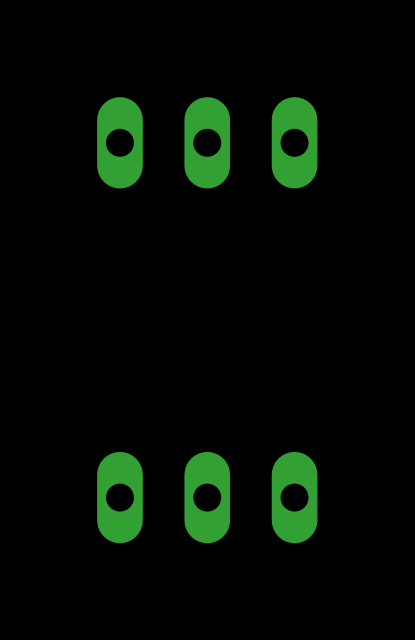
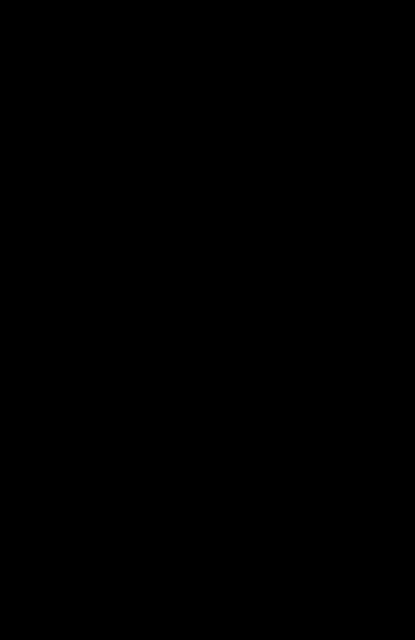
part: (207, 142) -> none
part: (207, 497) -> none

